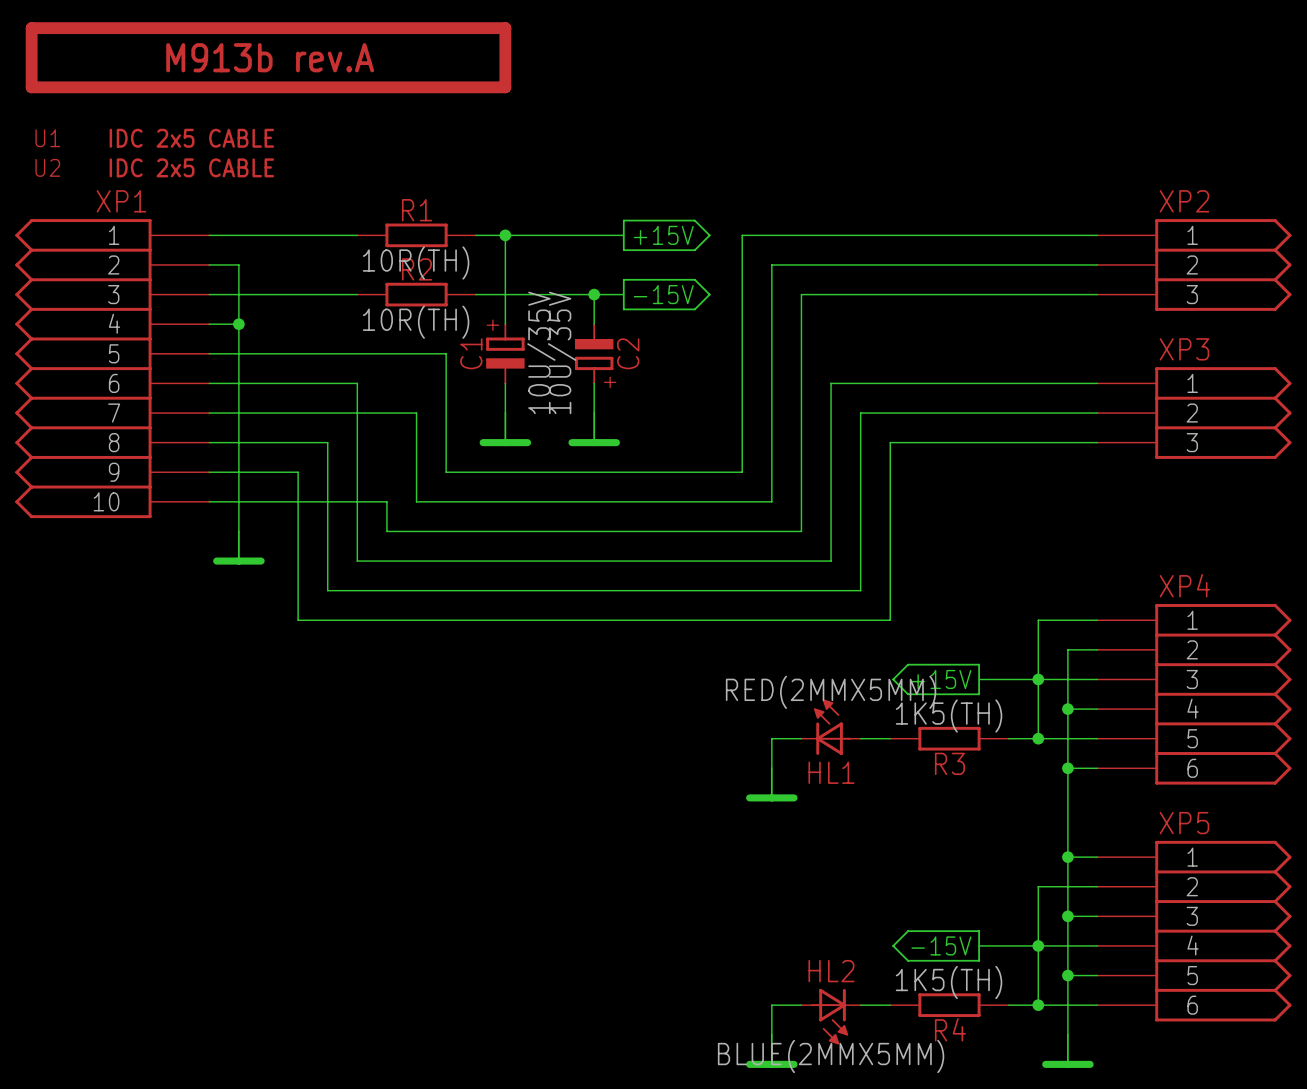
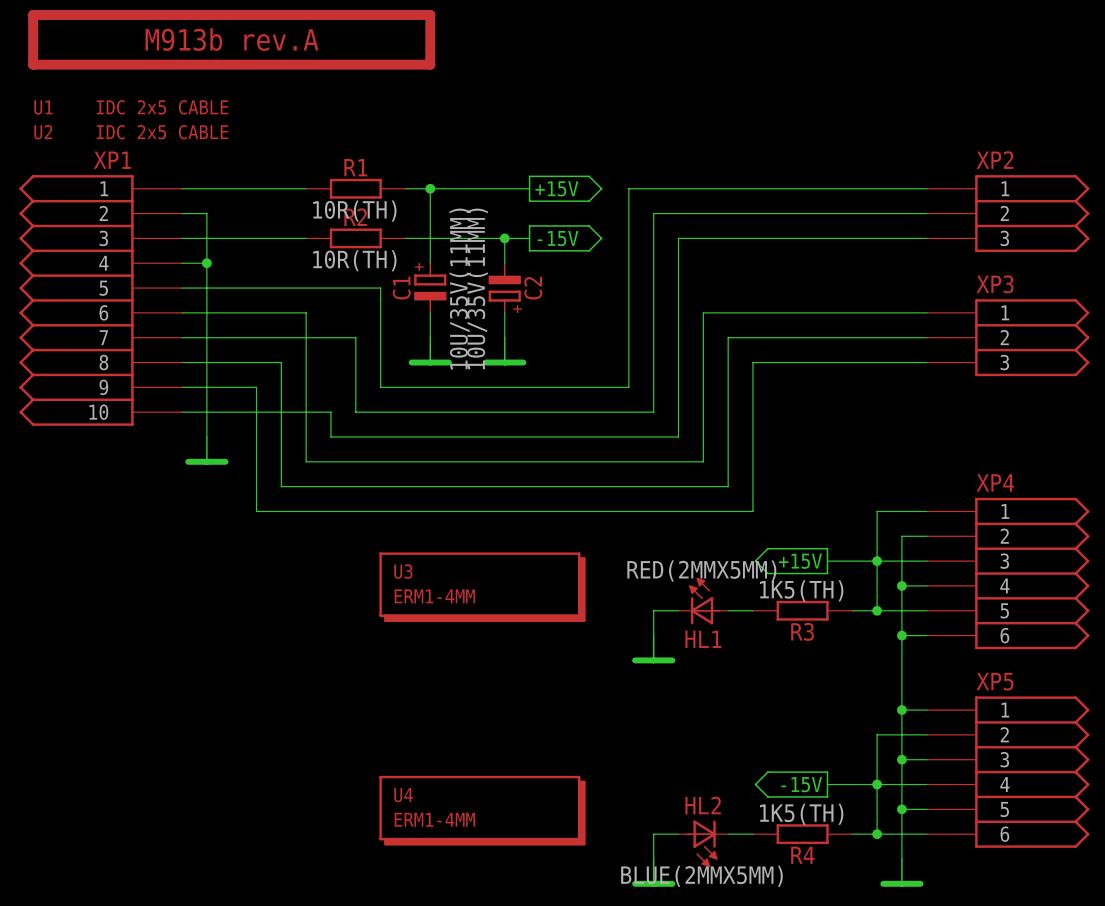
C1 value: 10U/35V (541, 352) -> 10U/35V(11MM) (460, 288)
C2 value: 10U/35V (562, 352) -> 10U/35V(11MM) (477, 288)
U3: none -> ERM1-4MM (482, 587)
U4: none -> ERM1-4MM (482, 810)

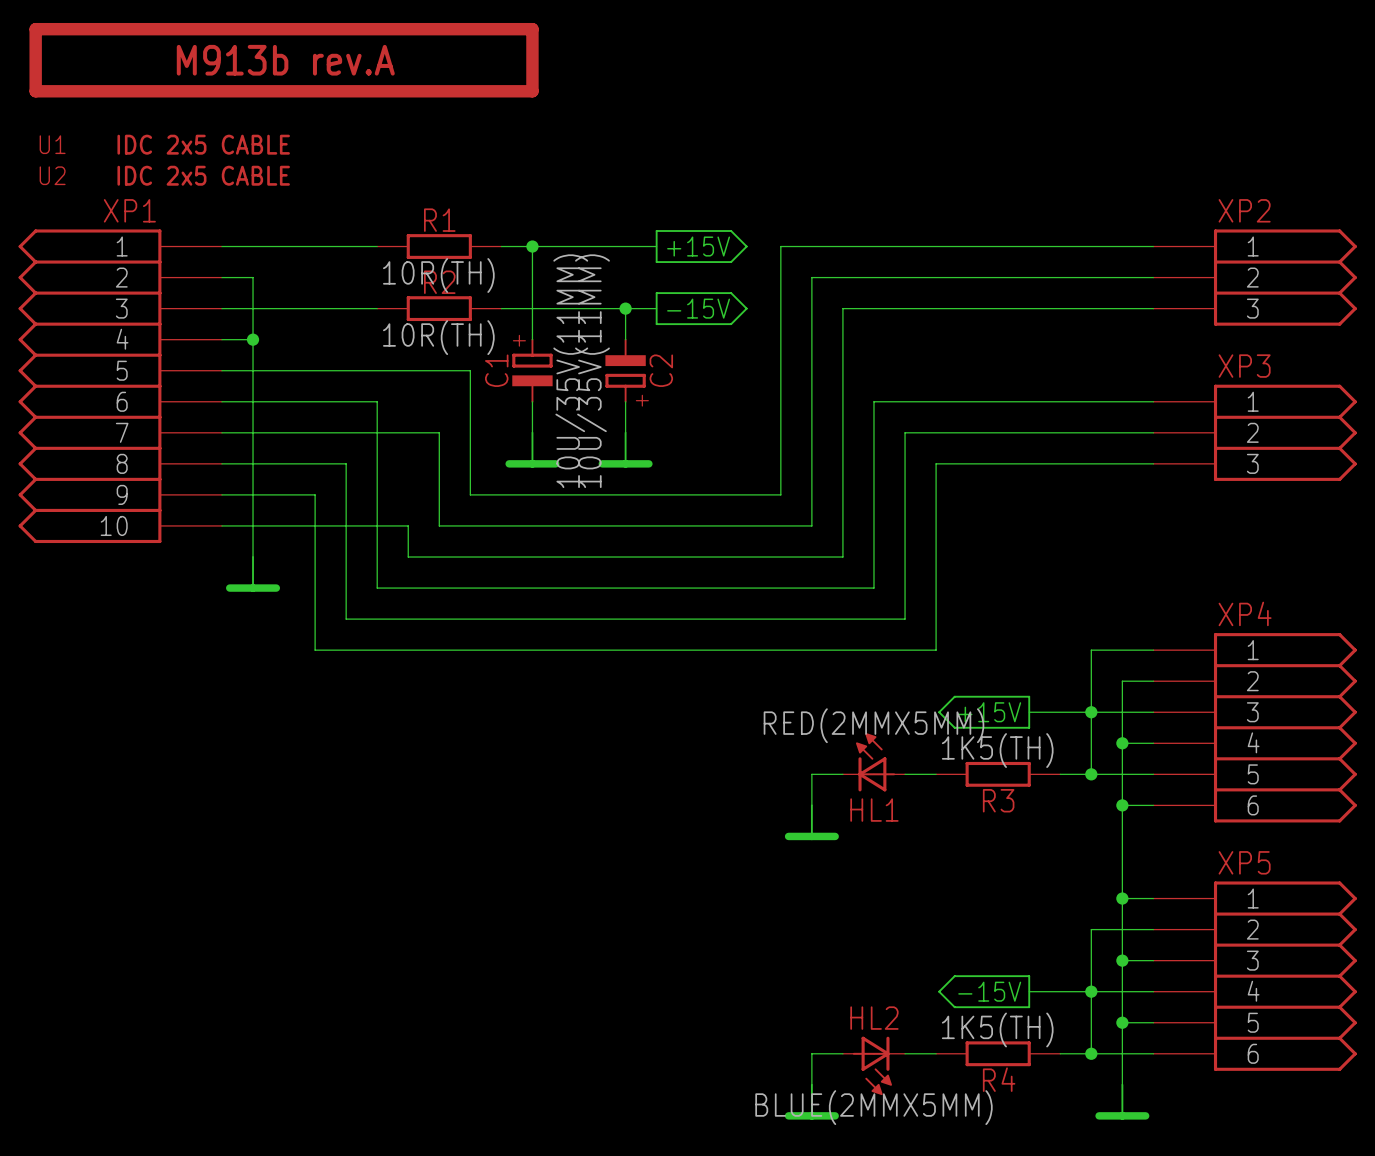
U3: ERM1-4MM (482, 587) -> none
U4: ERM1-4MM (482, 810) -> none

